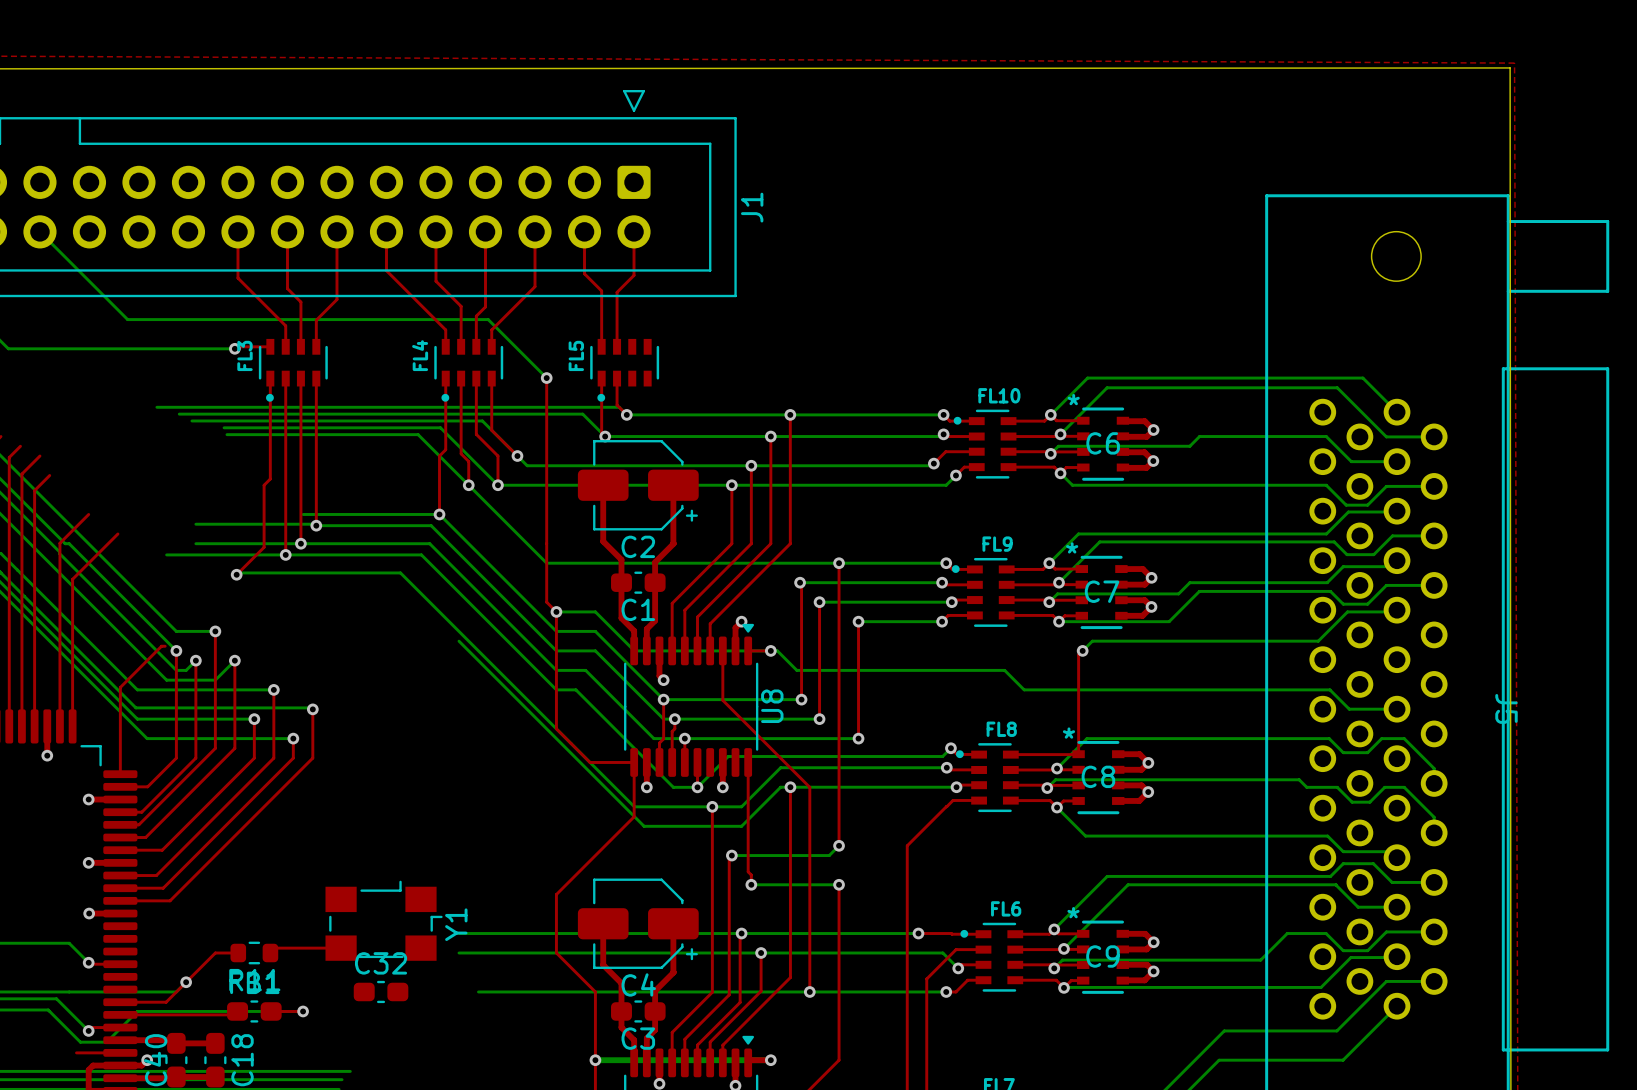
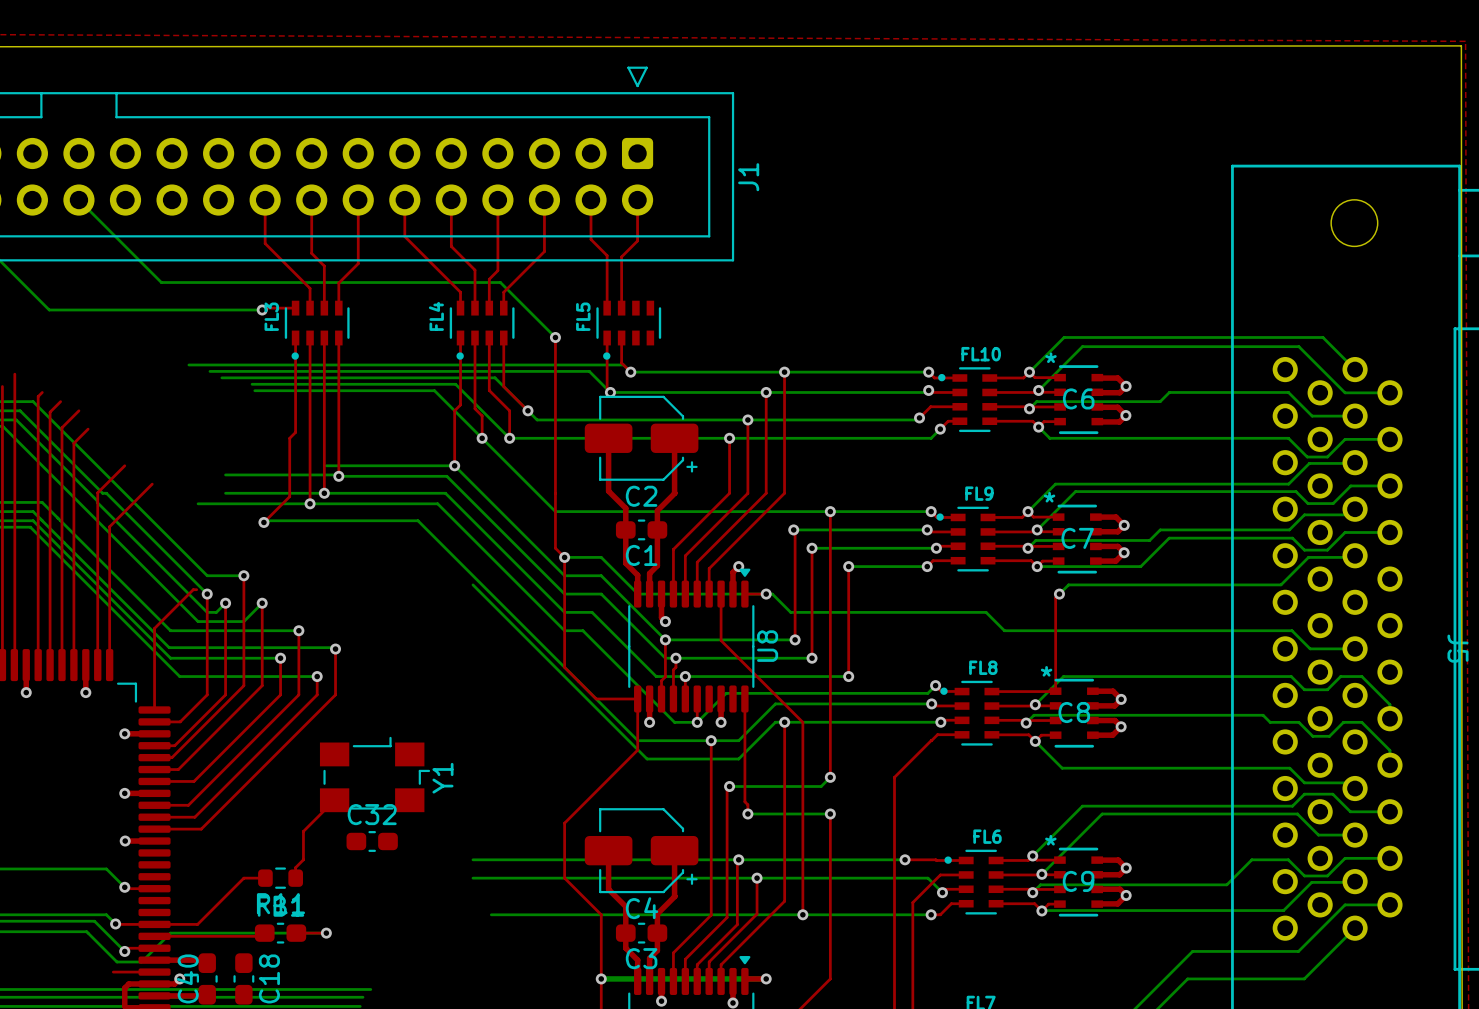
Y1 position: (384, 920) -> (375, 774)
top track: (341, 948) (275, 948) (270, 953) -> (334, 800) (303, 831) (303, 859) (295, 867) (295, 878)
bottom track: (186, 982) (176, 991) (69, 991) -> (115, 923) (106, 914)
via position: (186, 982) -> (115, 923)
C32 position: (381, 991) -> (372, 841)
top track: none -> (115, 923) (154, 924)
top track: (176, 1043) (215, 1043) -> none
top track: (176, 1077) (215, 1077) -> none

